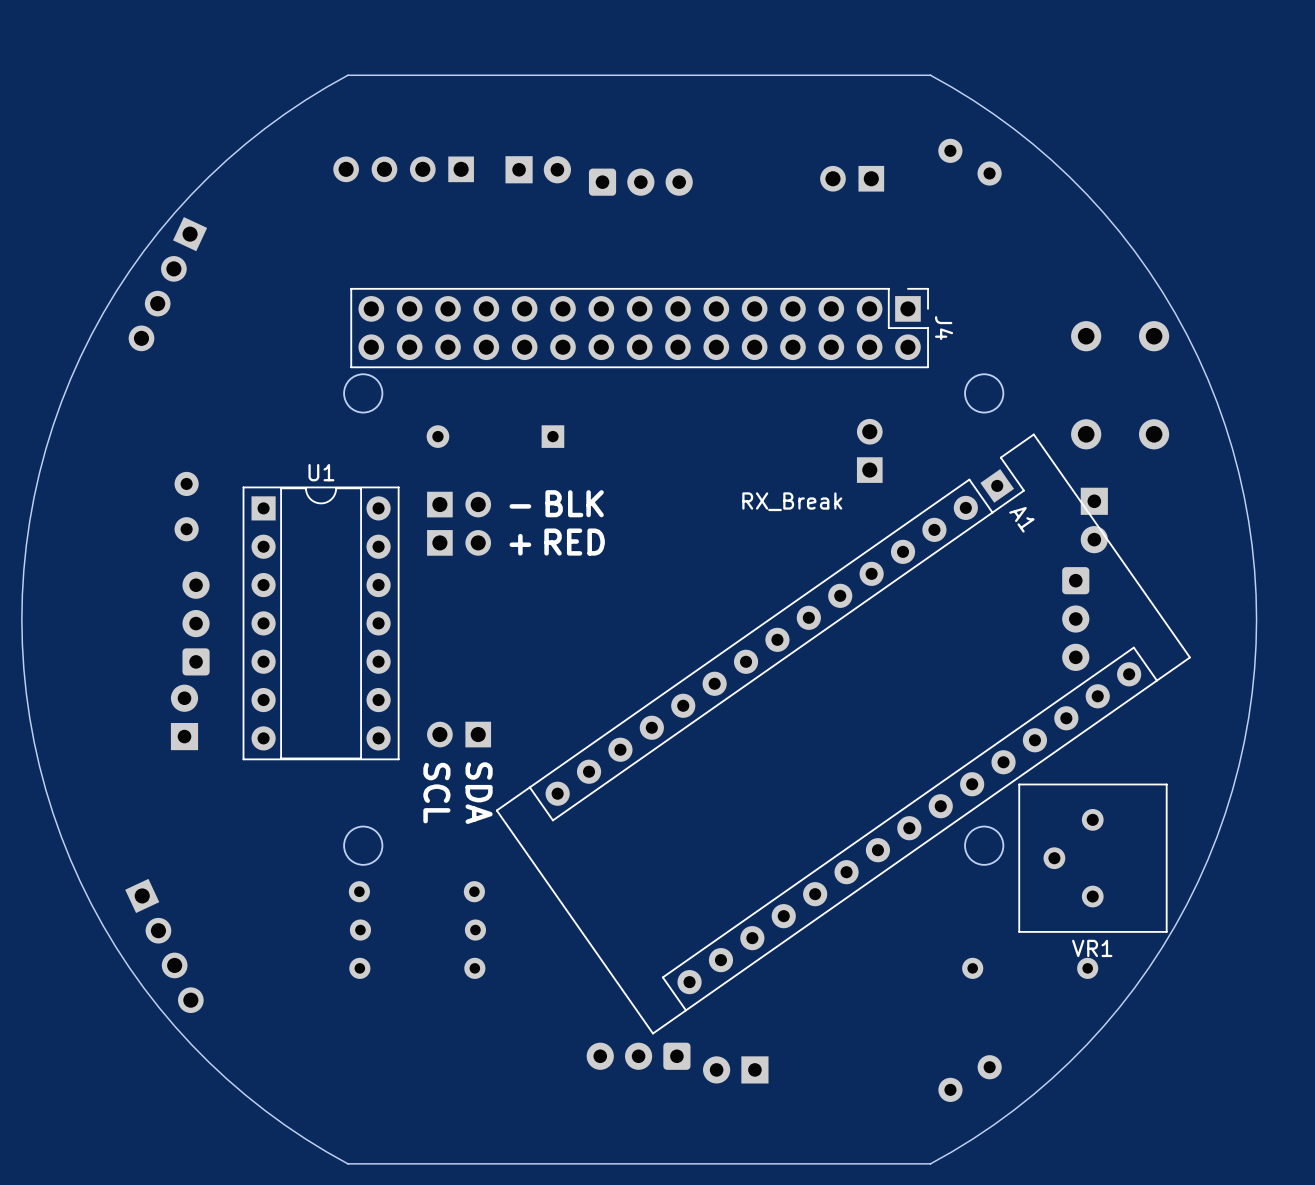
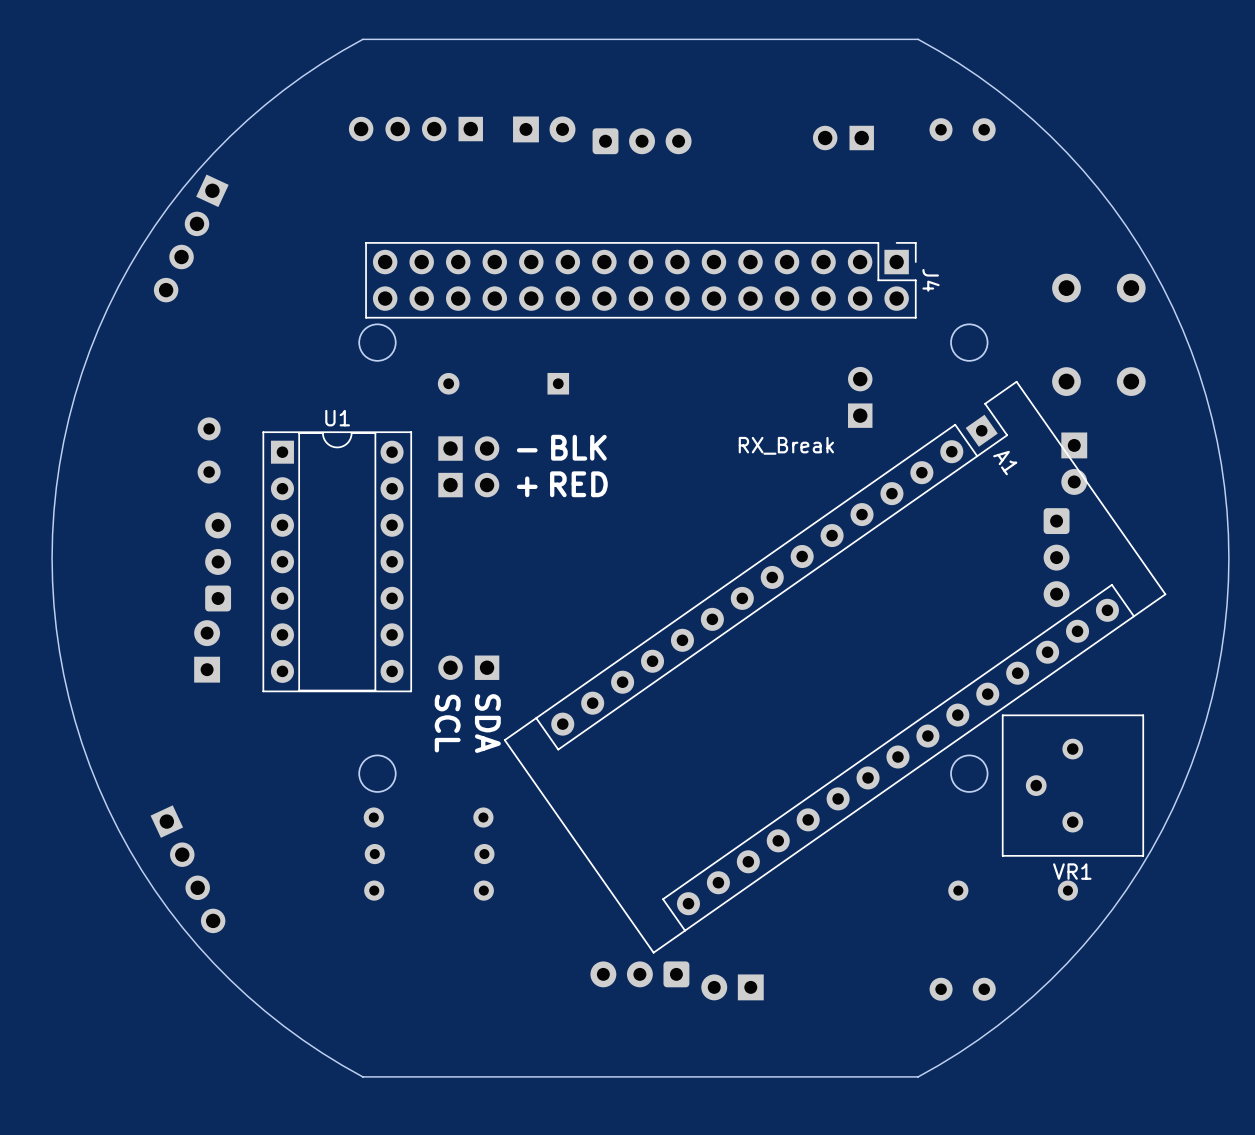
part rotation: 0° (969, 162) -> 30° counterclockwise (962, 129)
part rotation: 0° (970, 1078) -> 30° clockwise (962, 989)

